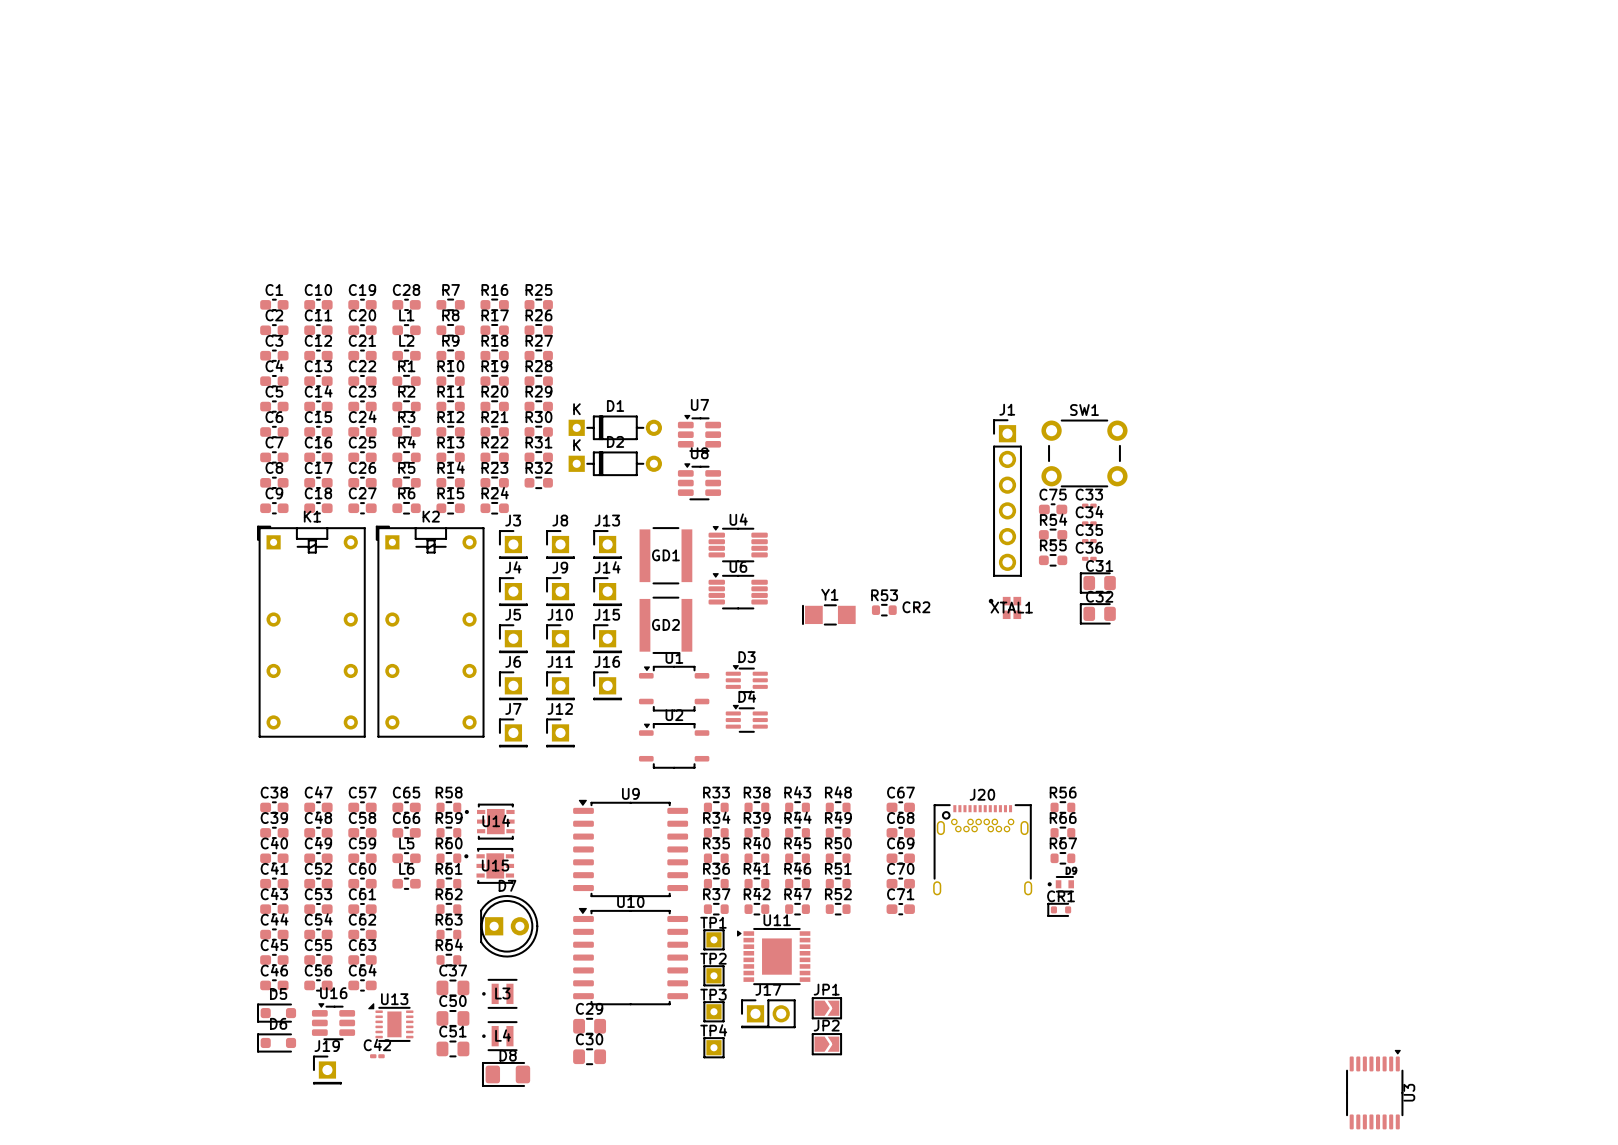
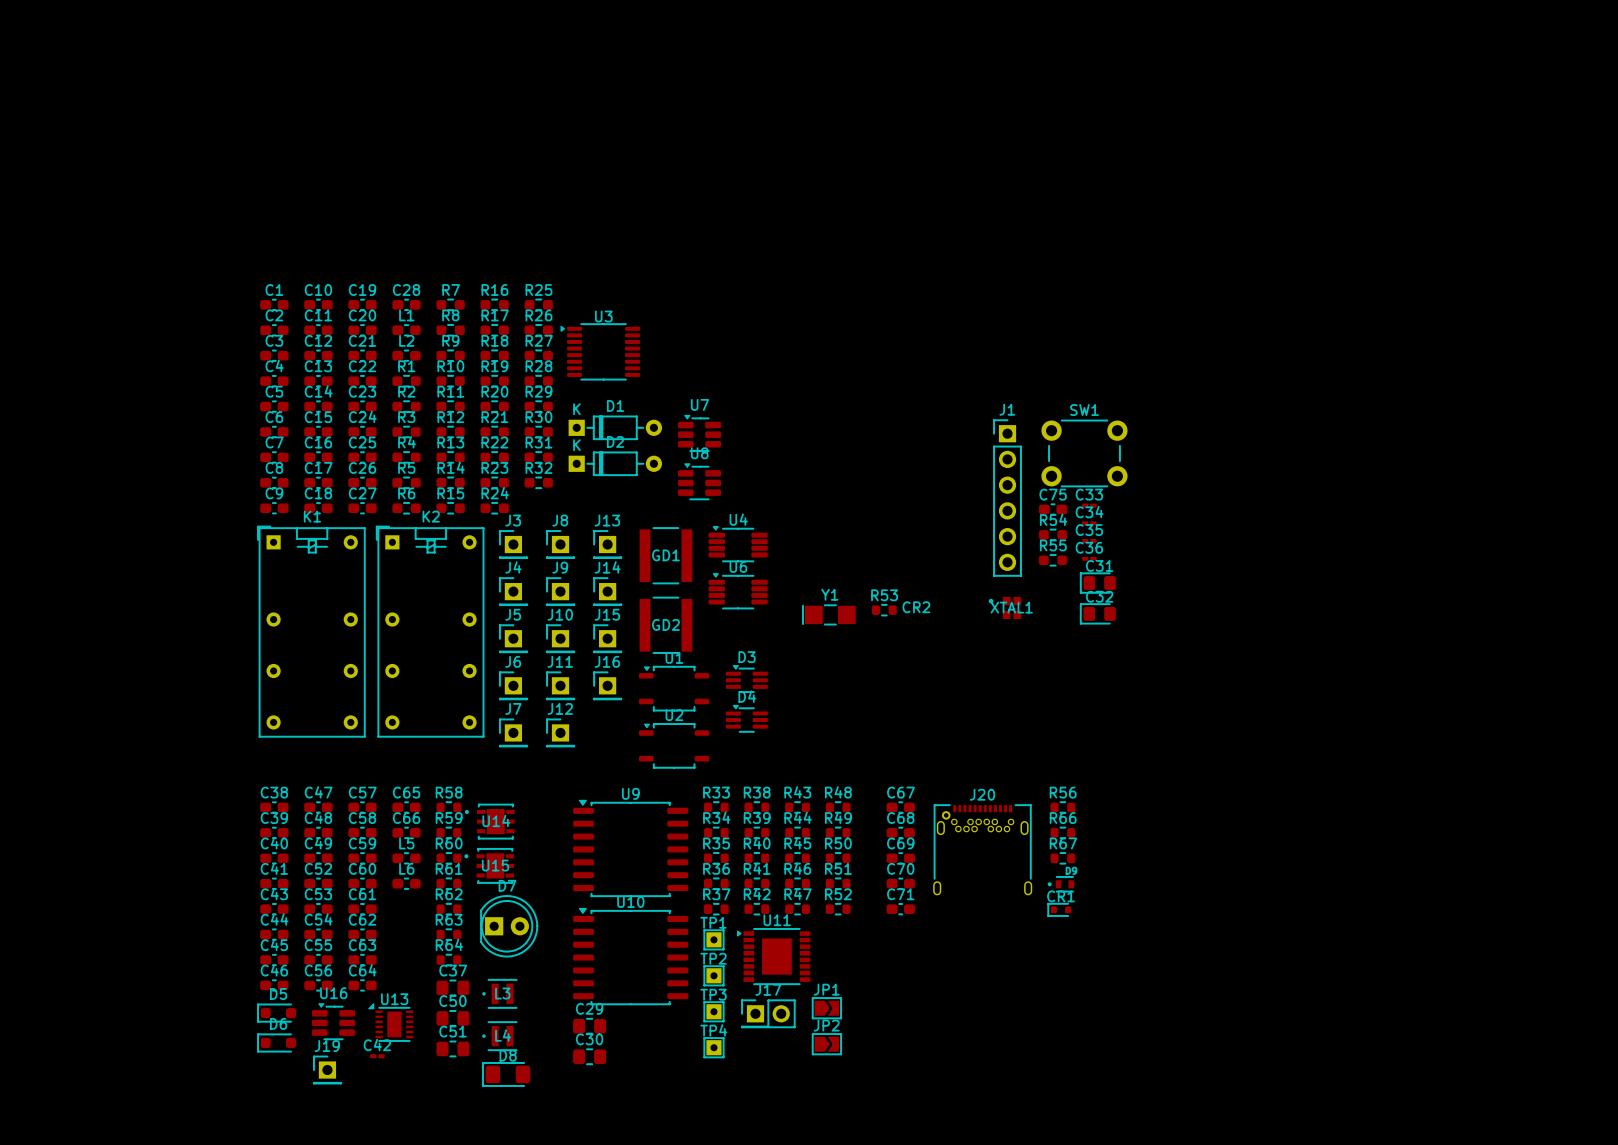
U3 rotation: 0° (1374, 1089) -> 90° counterclockwise (600, 351)
U3 position: (1374, 1089) -> (600, 351)

